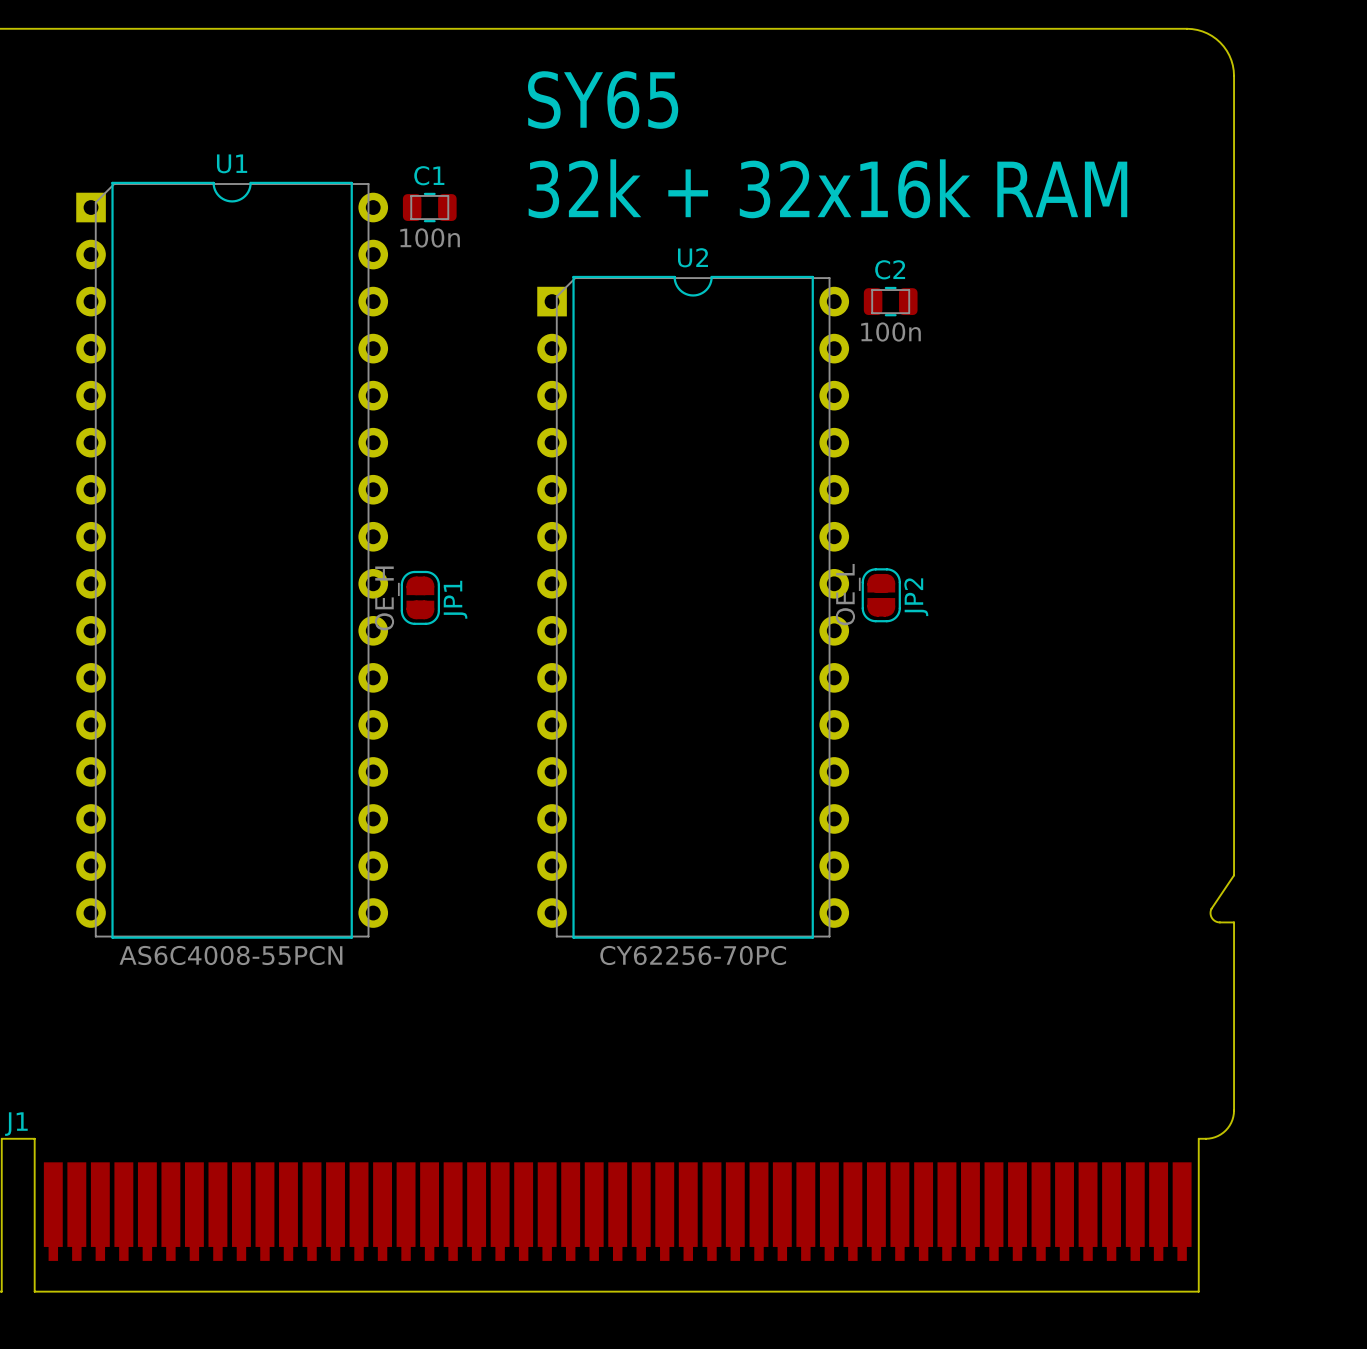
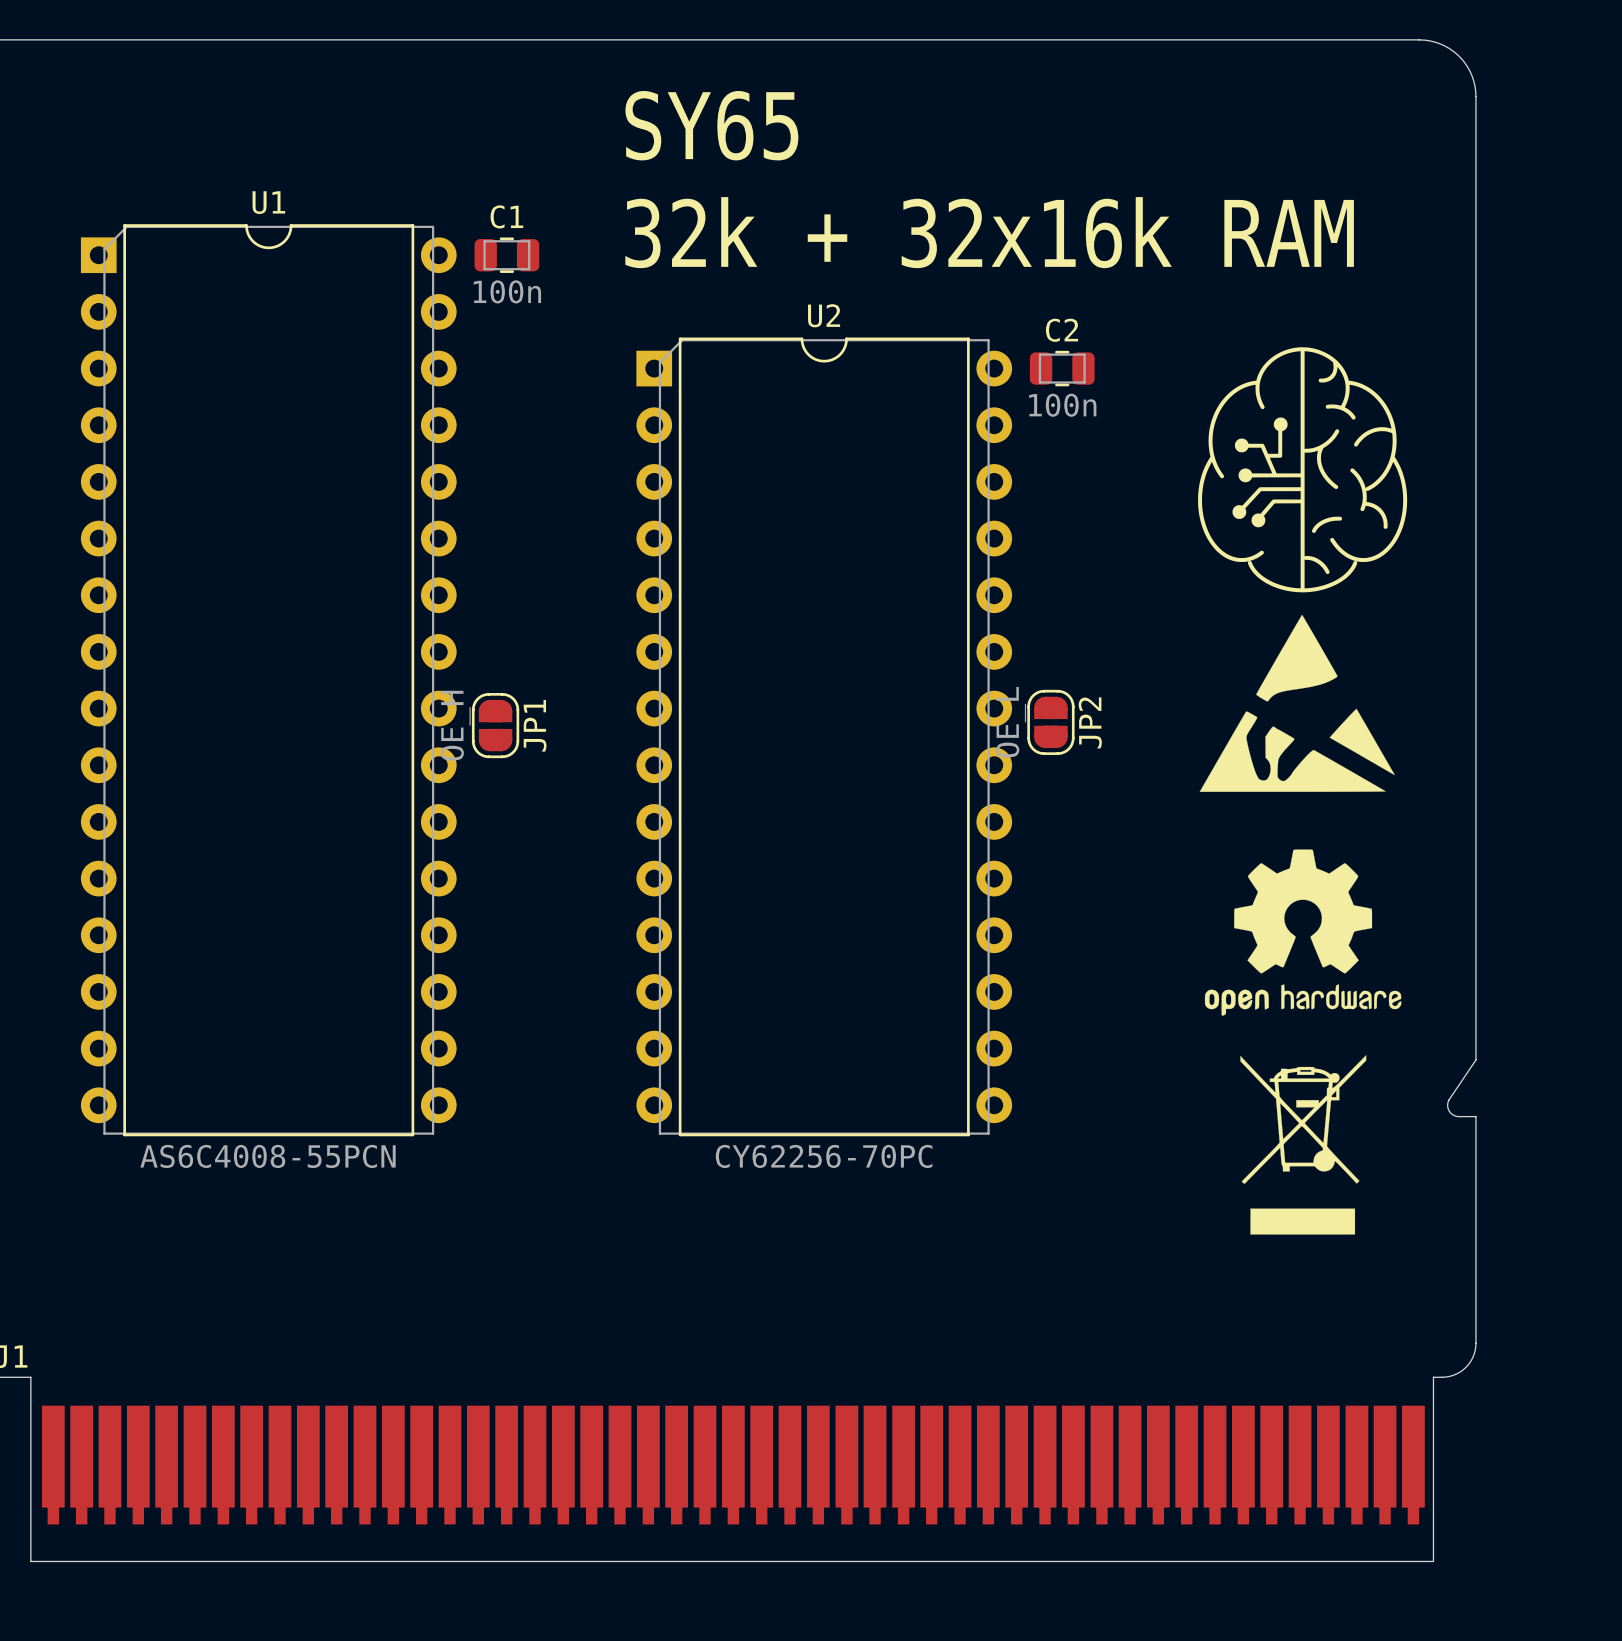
drawing: none -> [1198, 347, 1408, 792]
drawing: none -> [1204, 849, 1402, 1016]
drawing: none -> [1240, 1055, 1367, 1235]

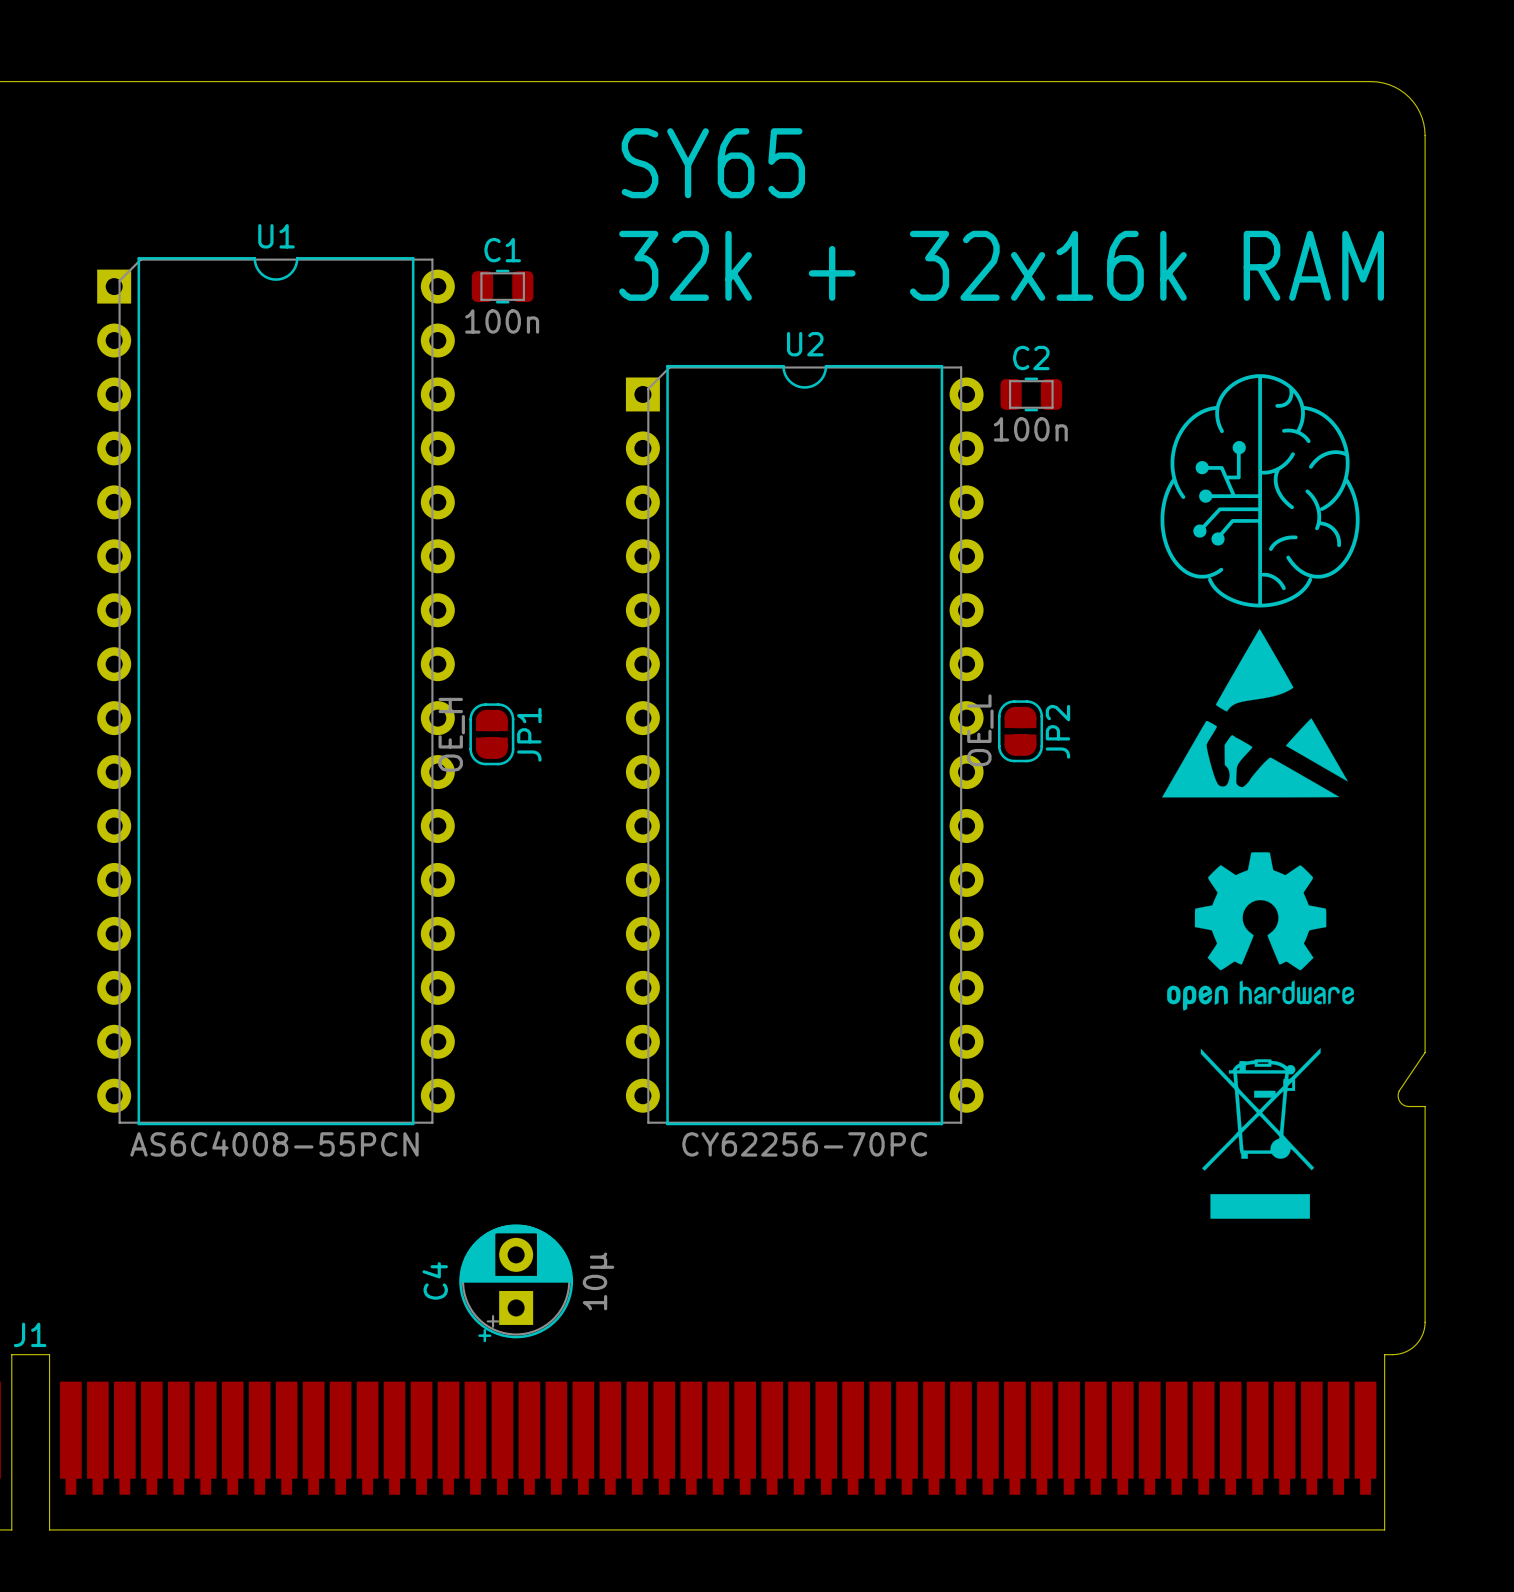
C4: none -> 10µ (516, 1283)

